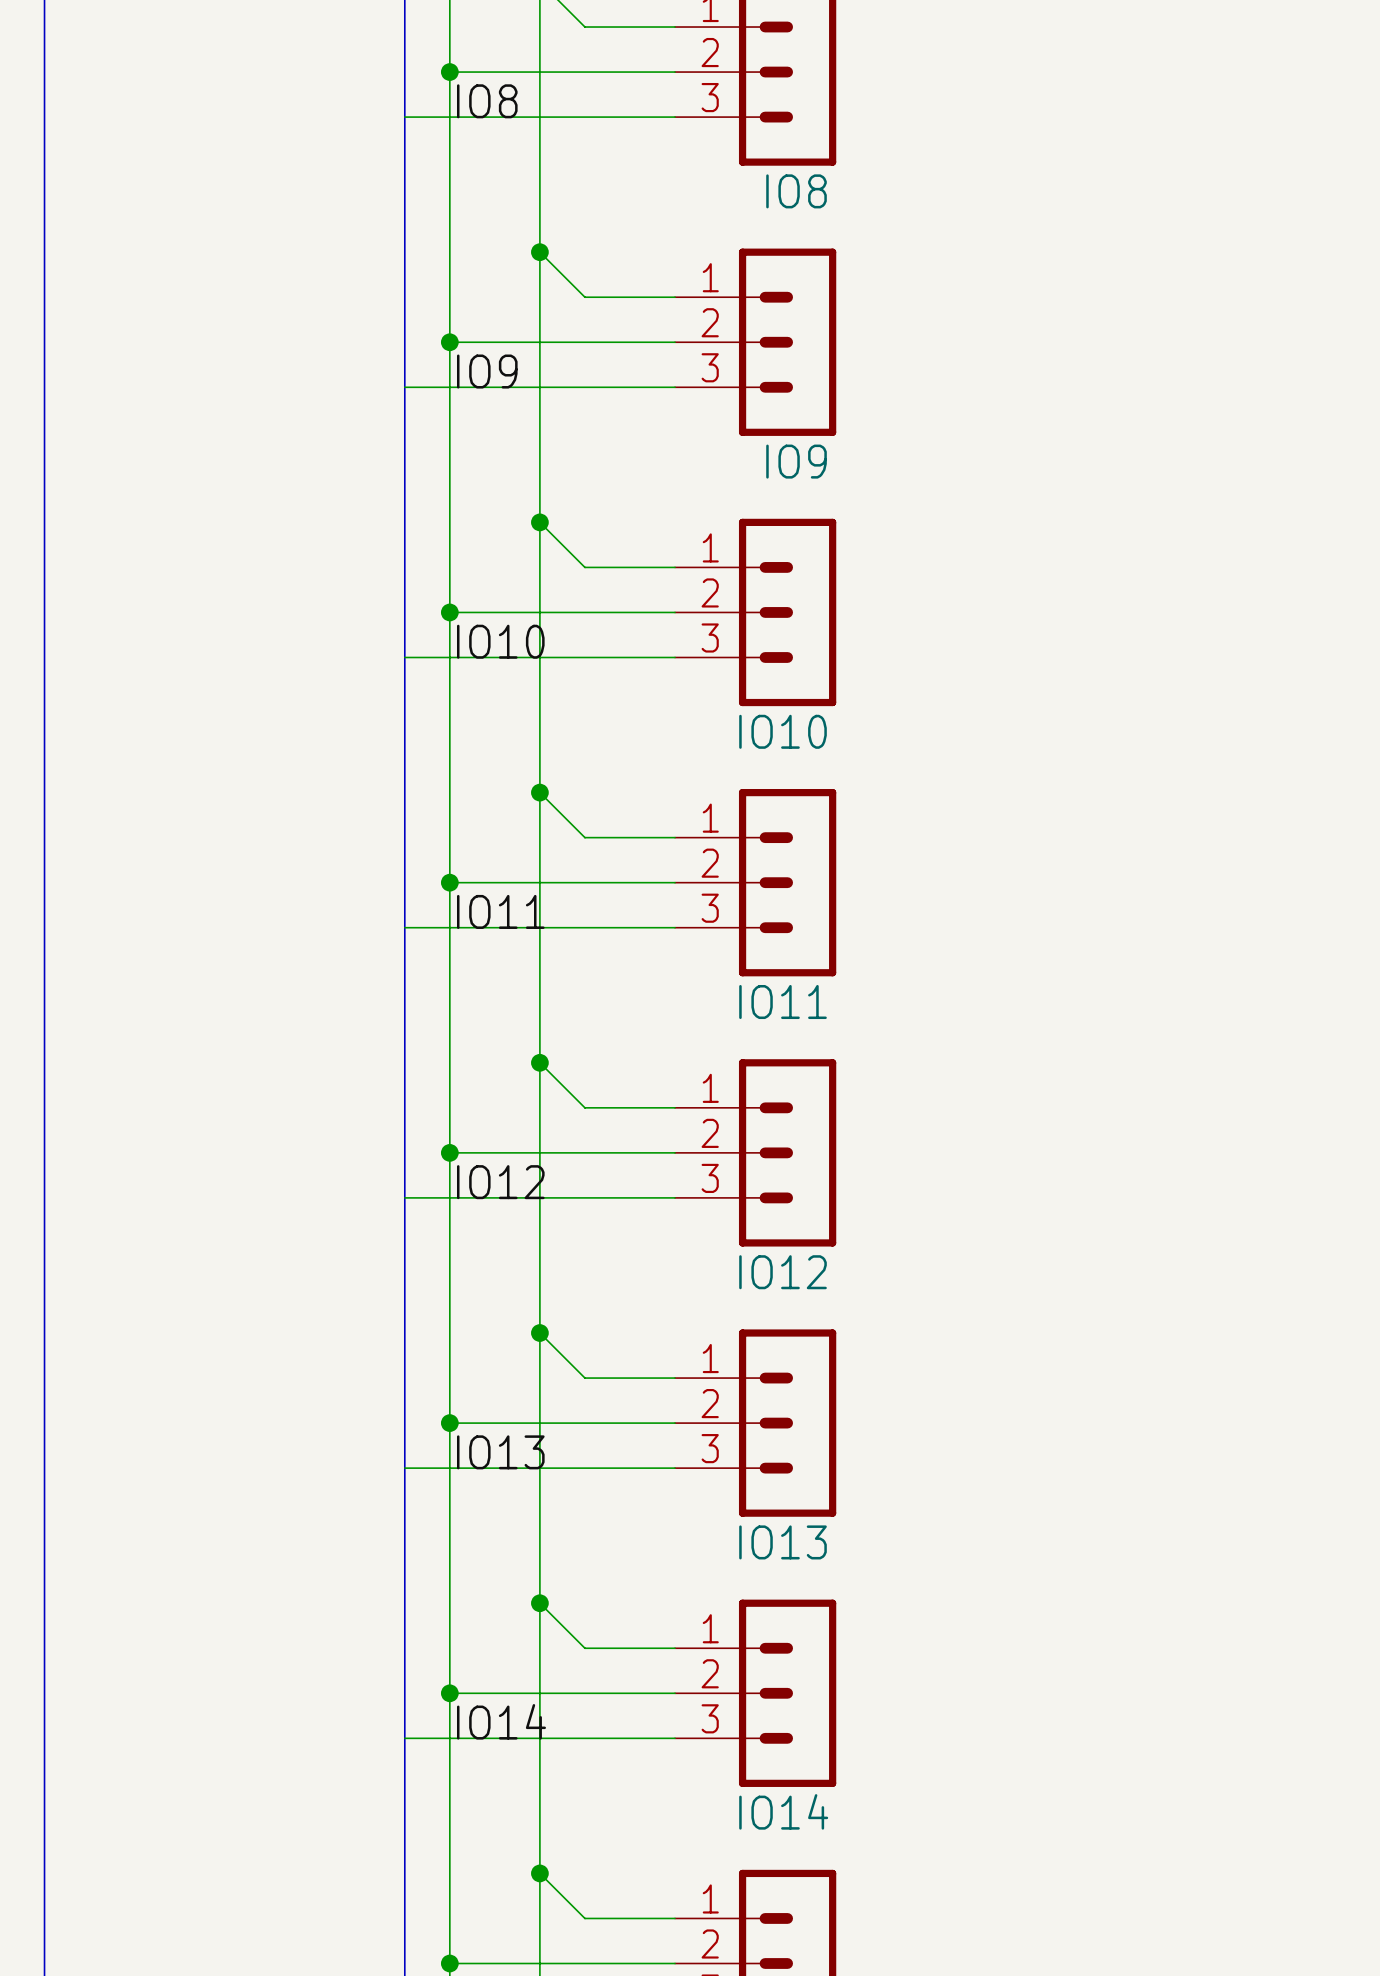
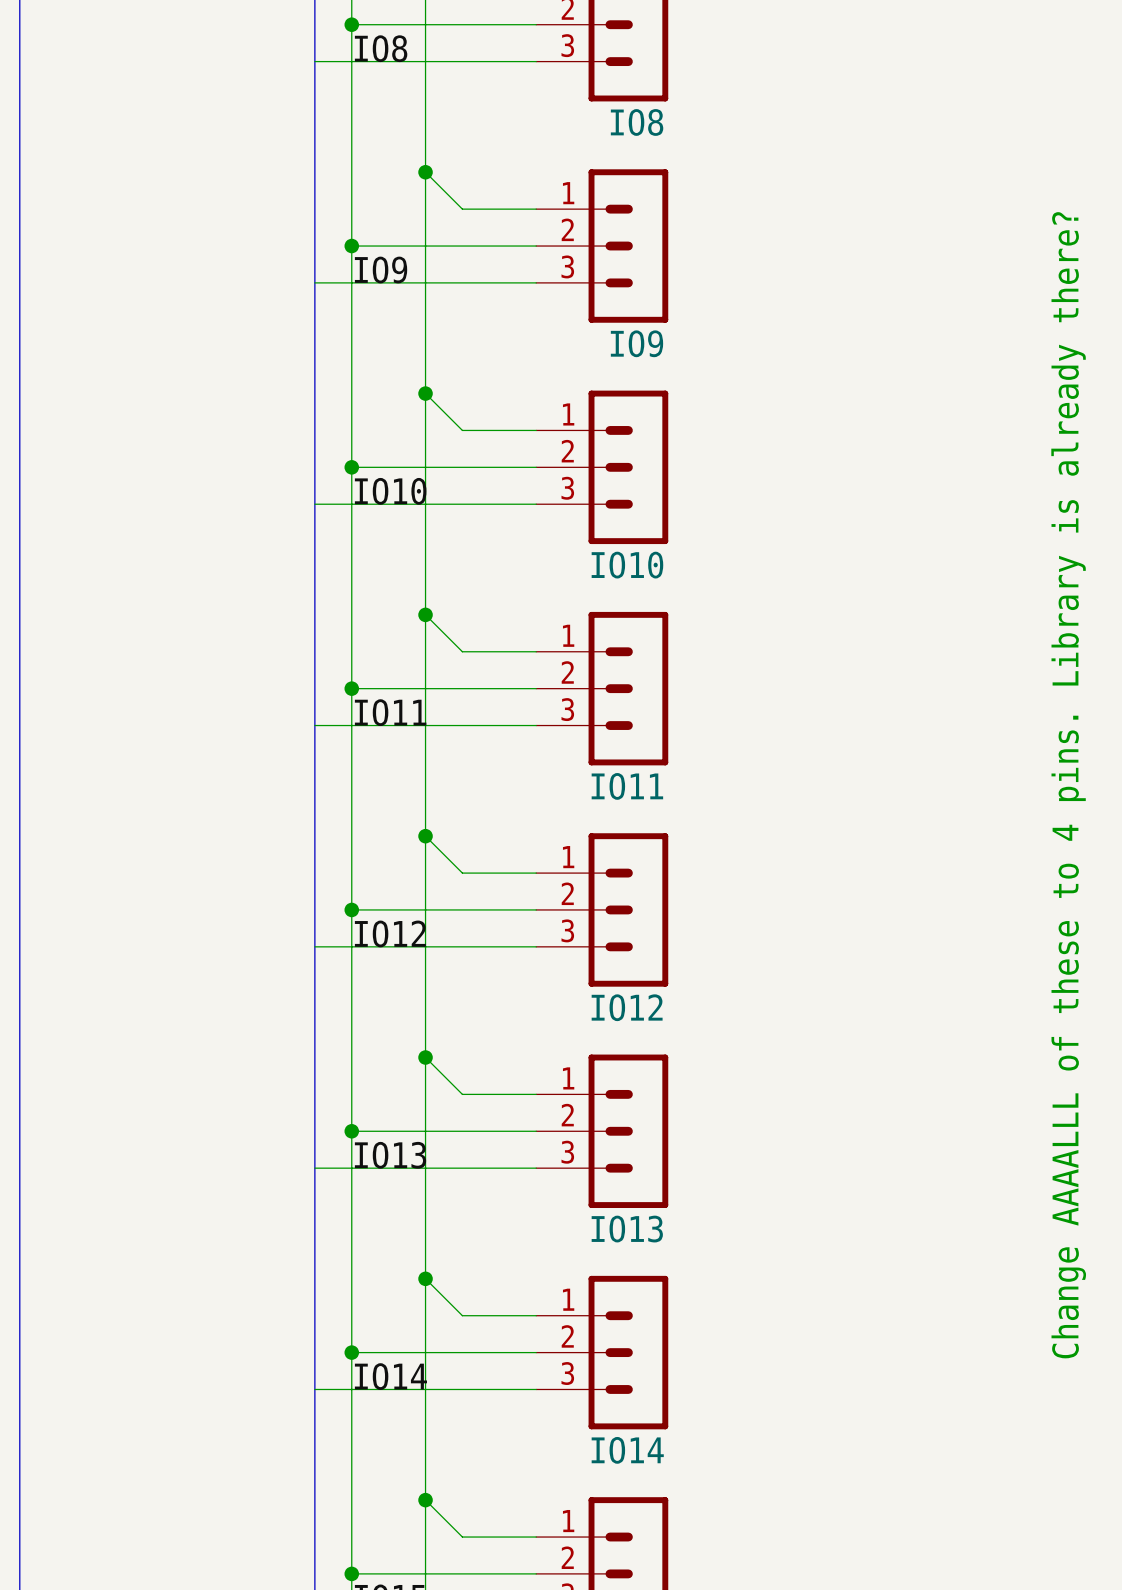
text: none -> Change AAAALLL of these to 4 pins. Library is already there? (1068, 785)

